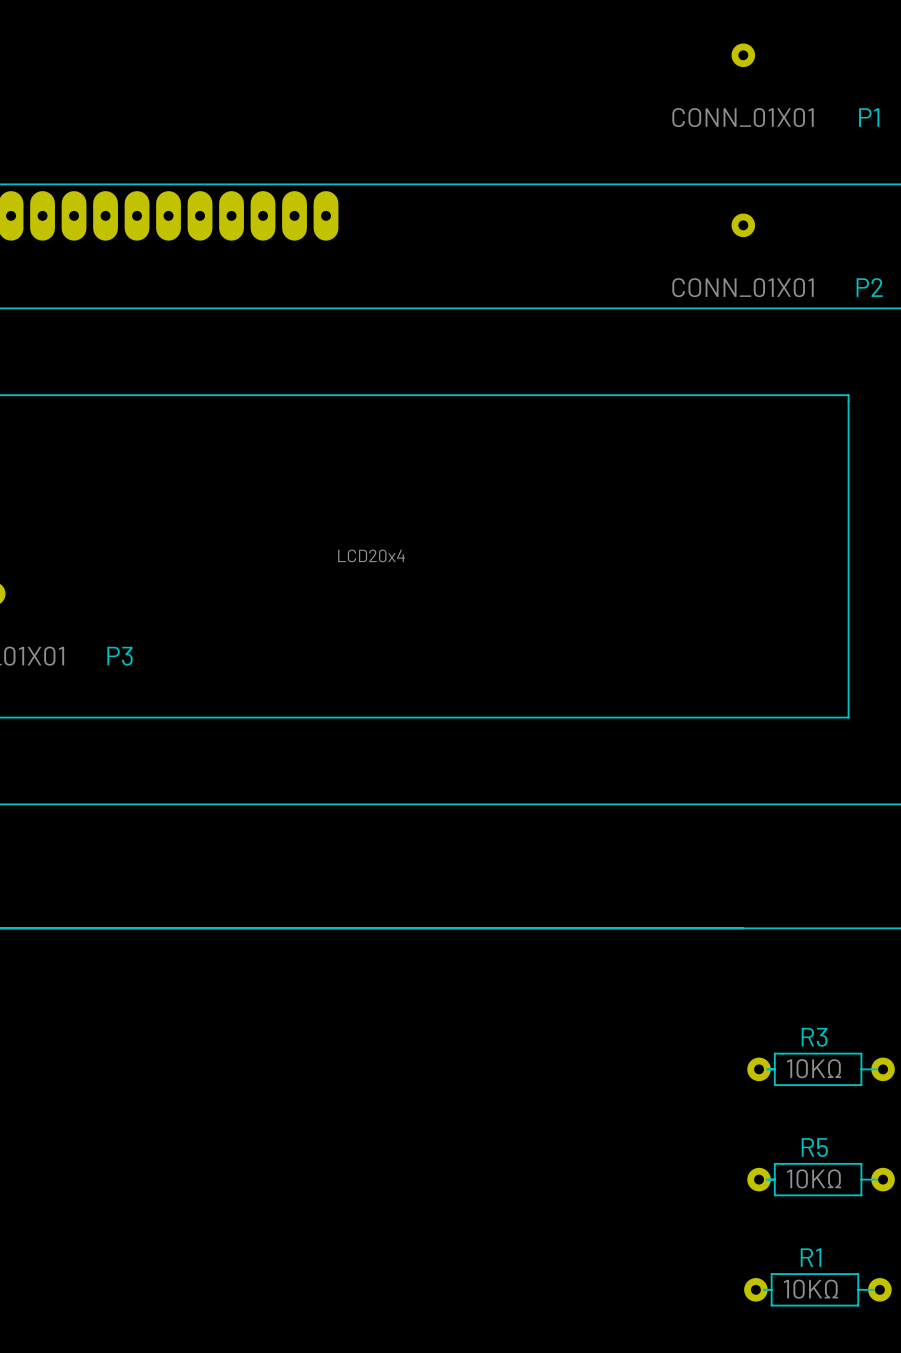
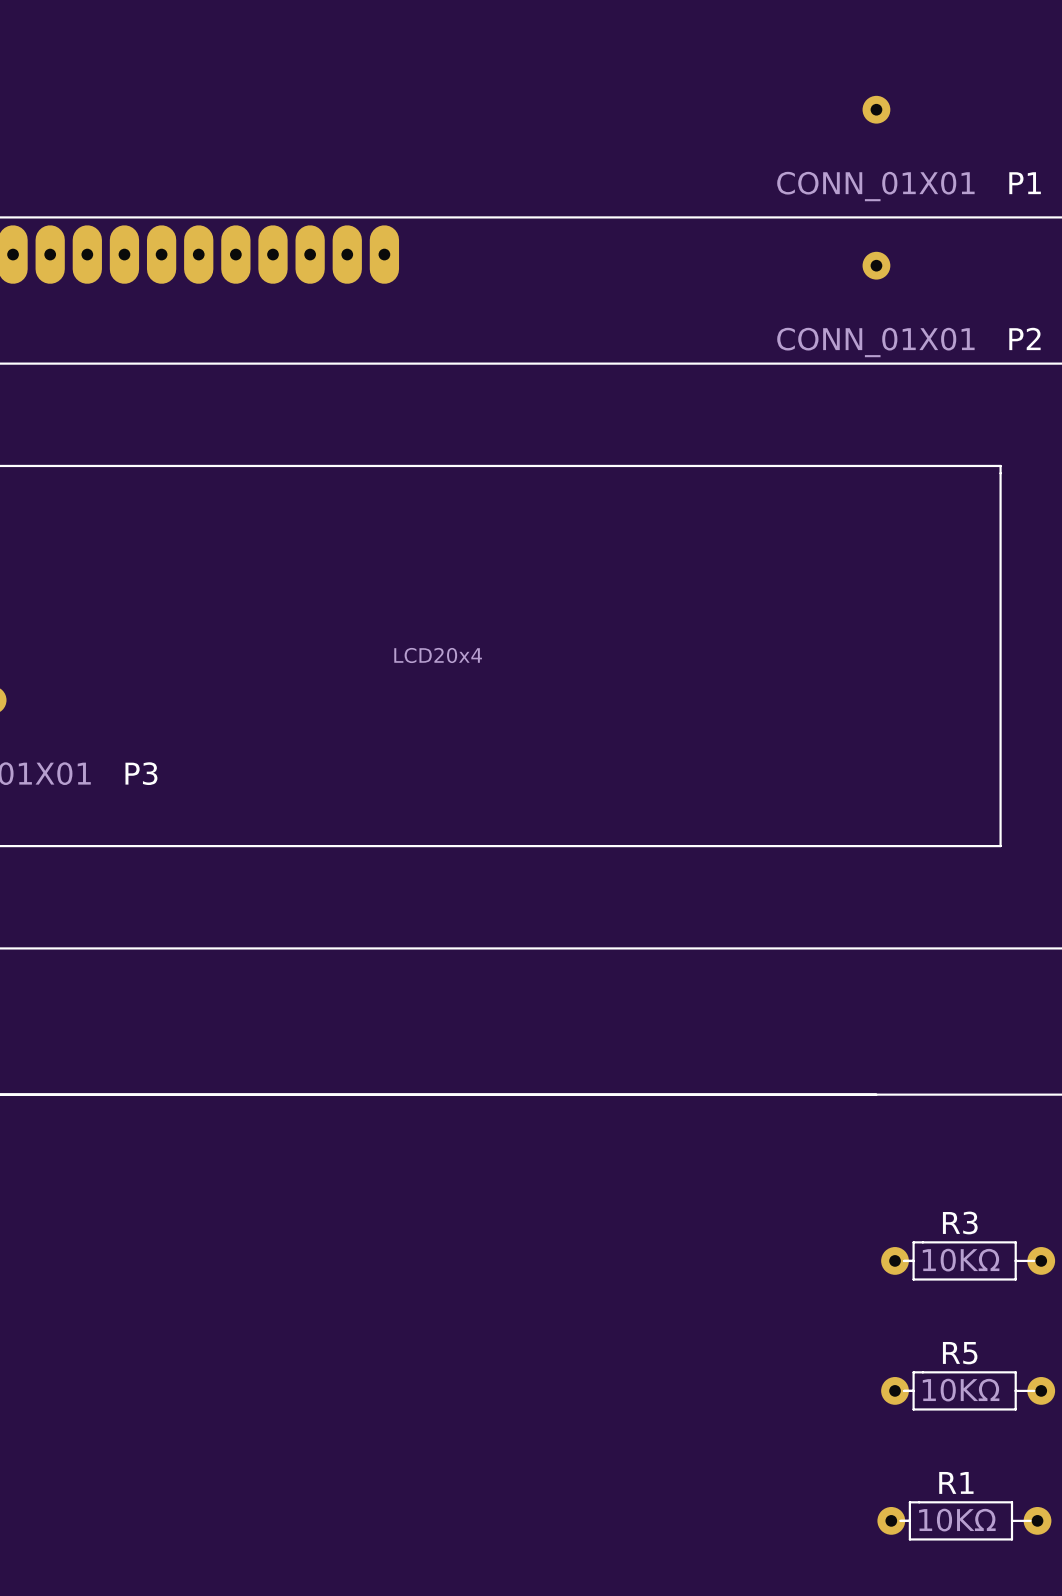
P1 position: (743, 55) -> (876, 109)

